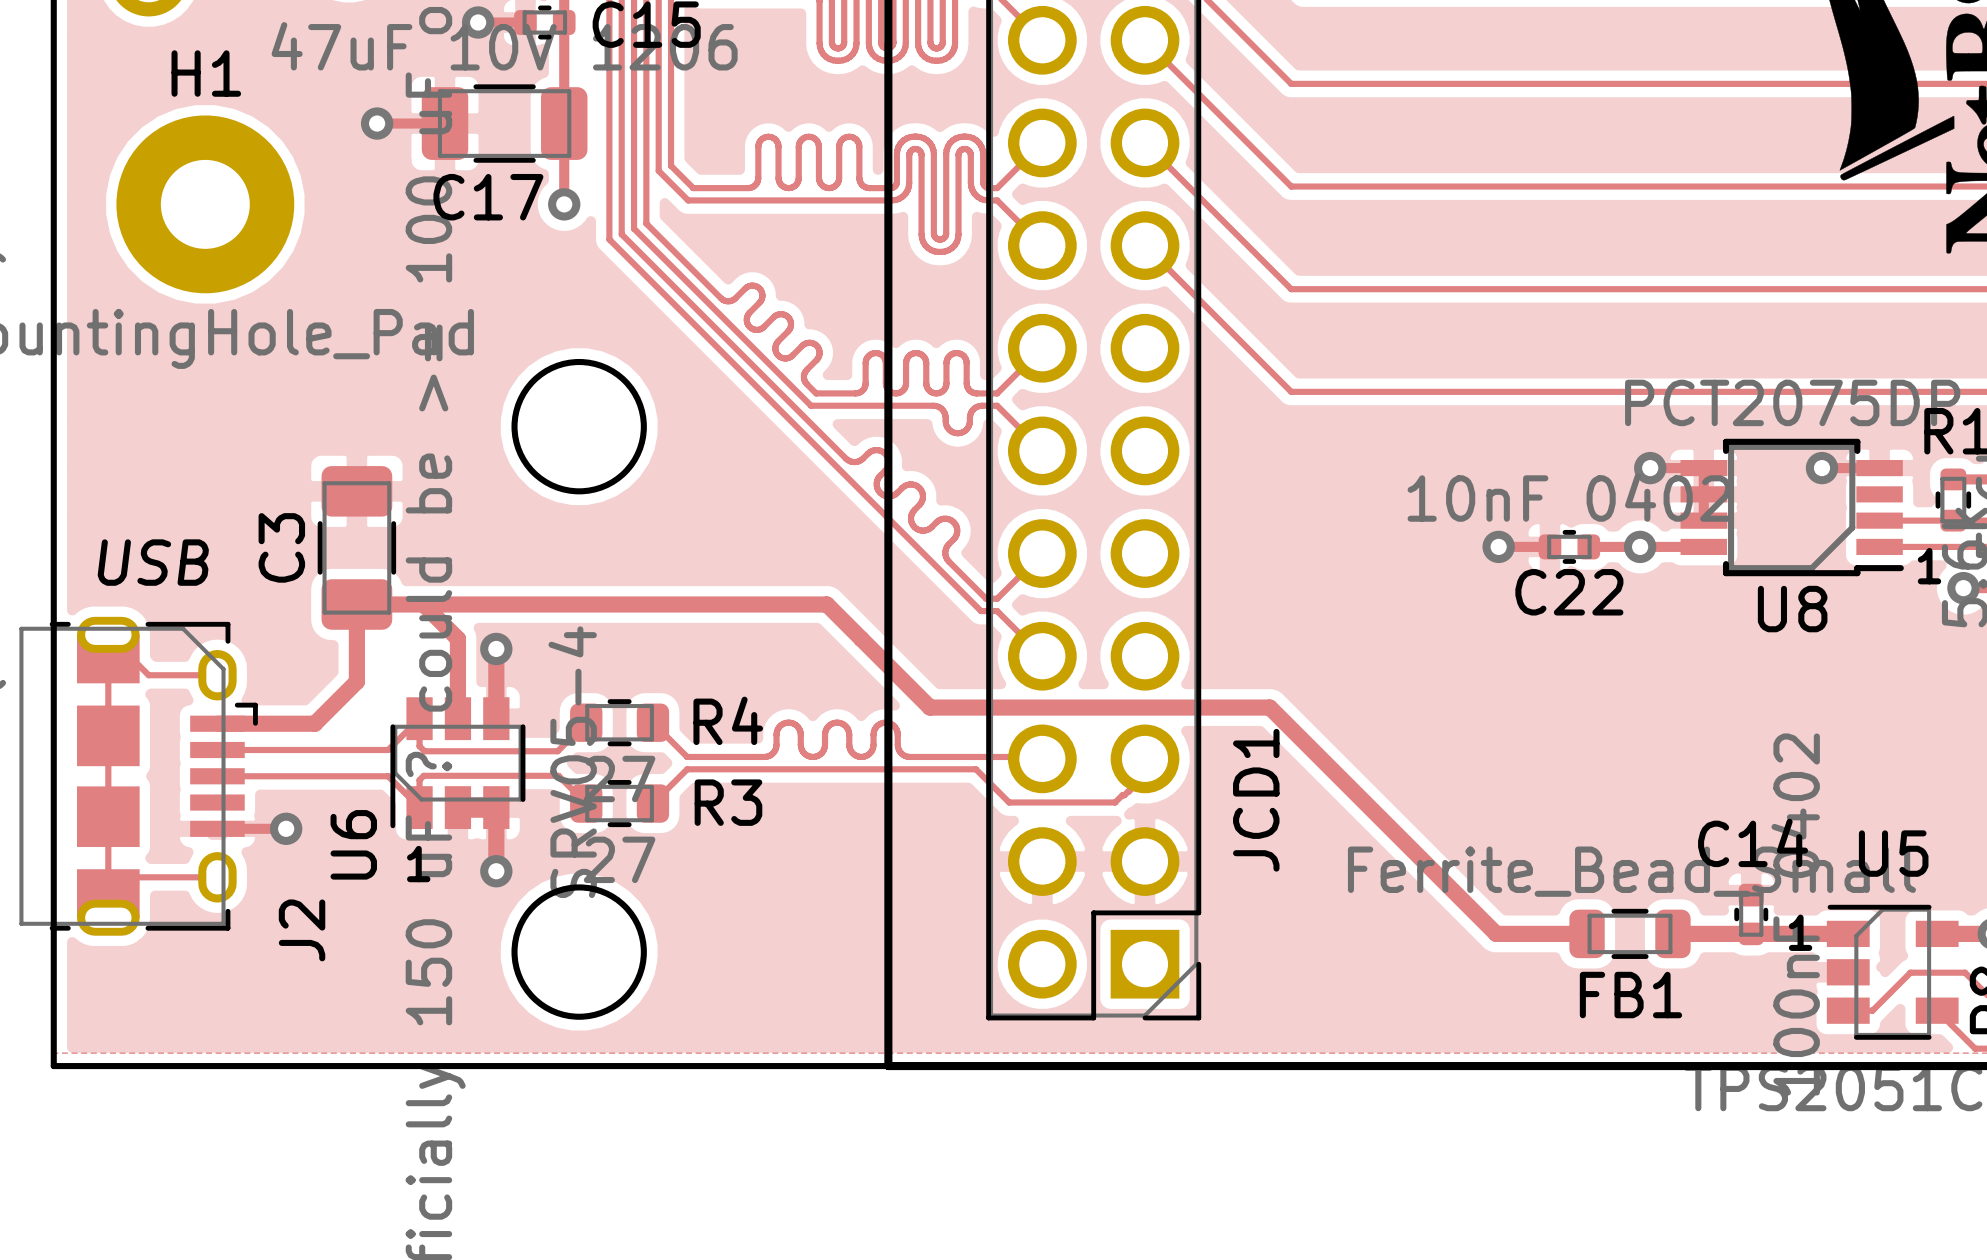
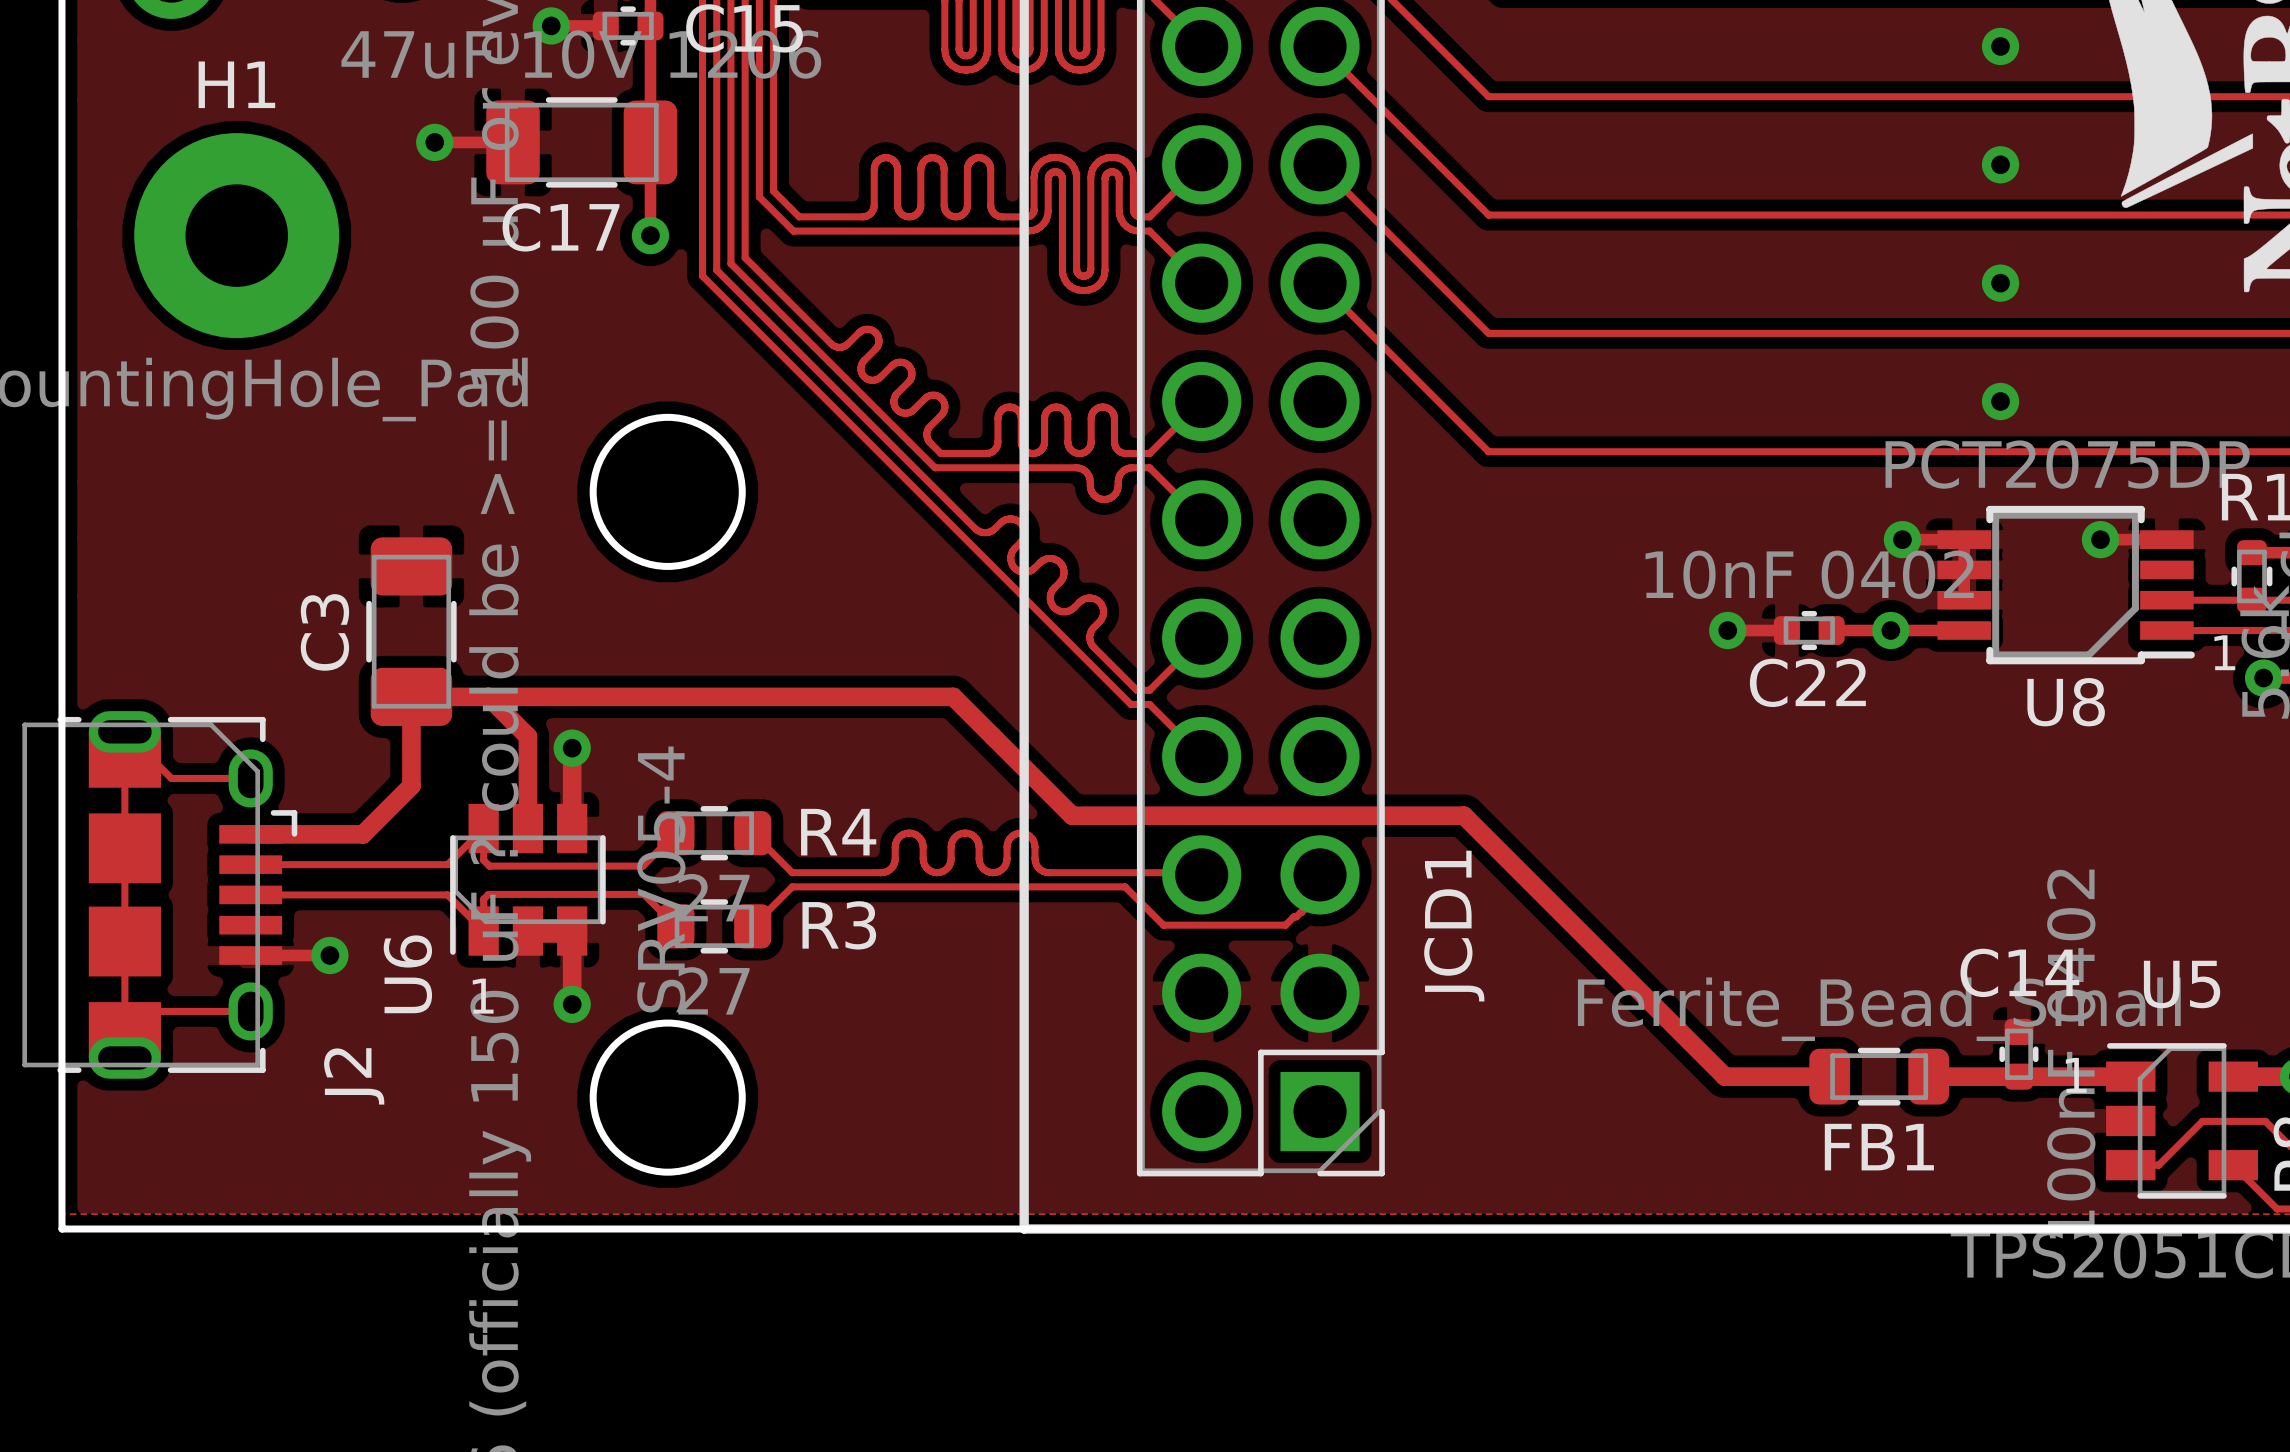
via: none -> (2000, 46)
via: none -> (2000, 164)
via: none -> (2000, 283)
via: none -> (2000, 401)
text: USB (153, 562) -> none

